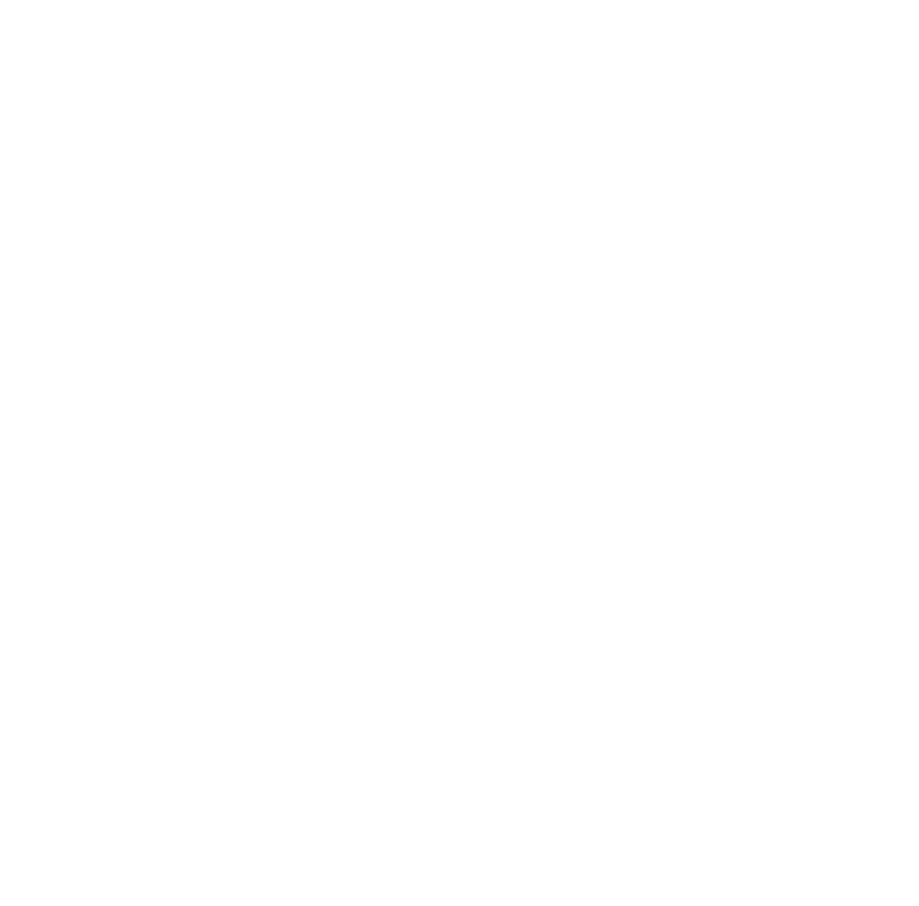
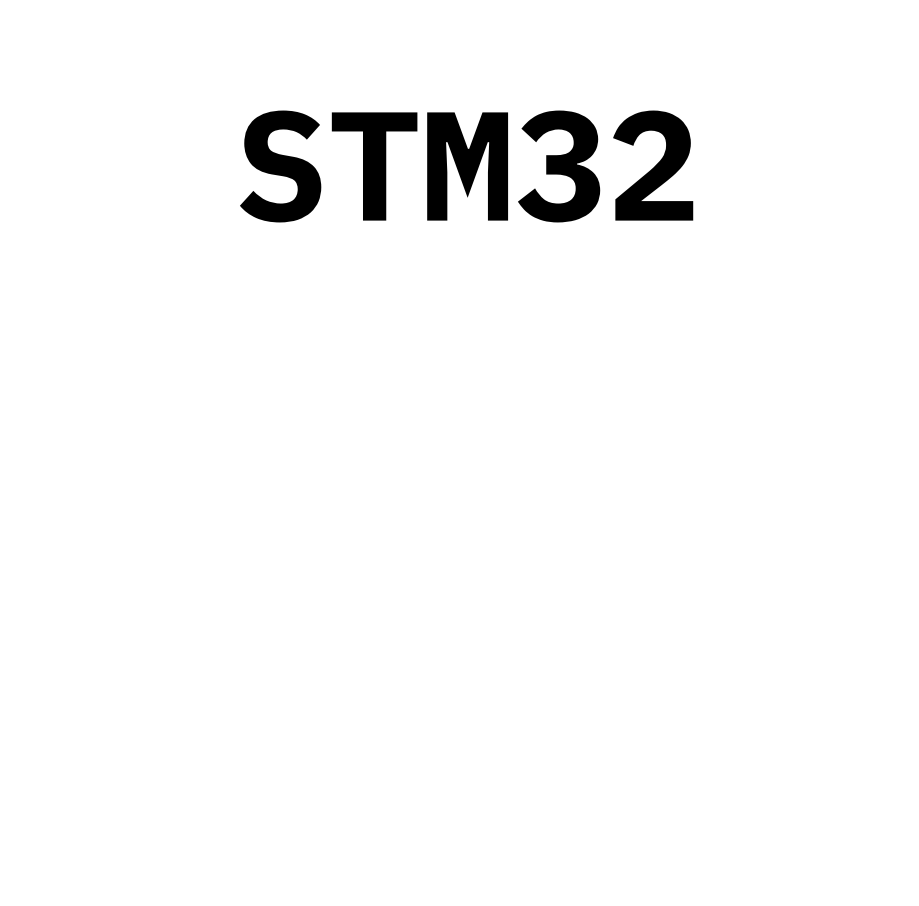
text: none -> STM32 (466, 166)

